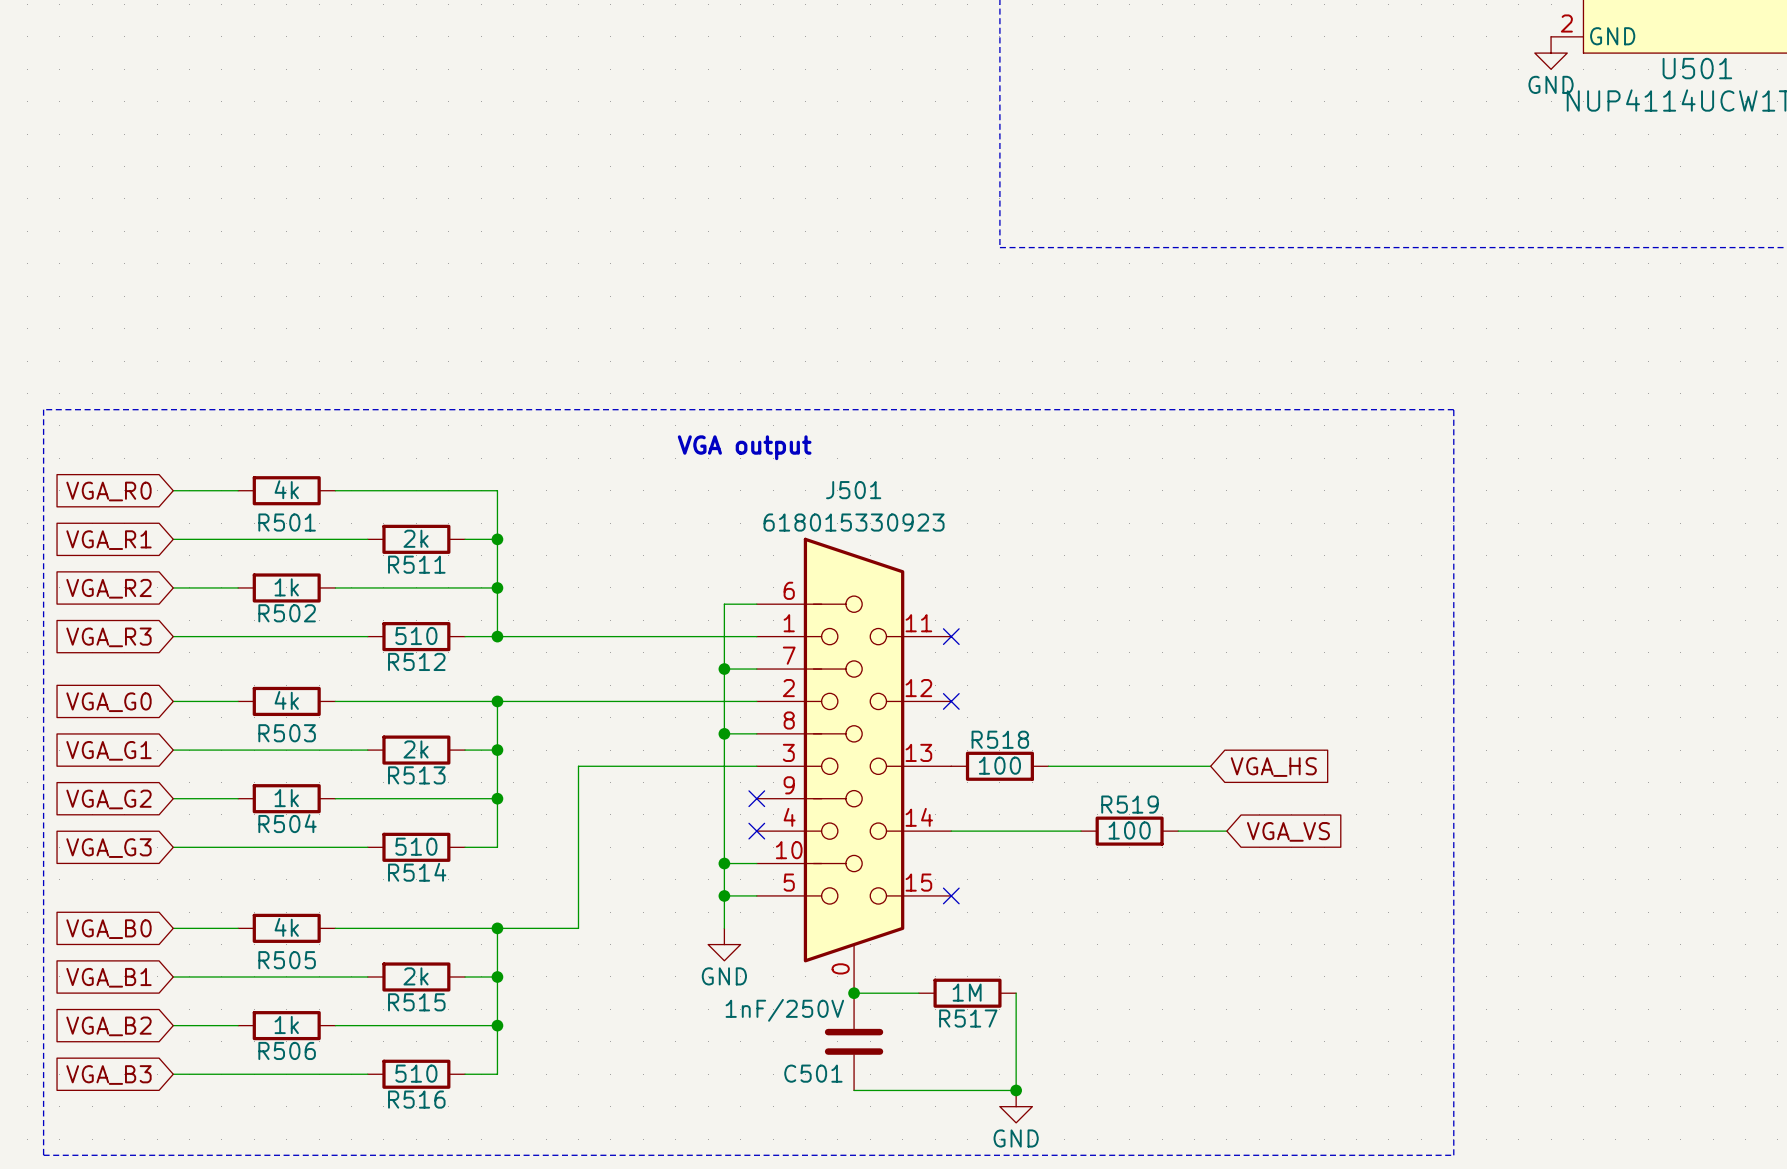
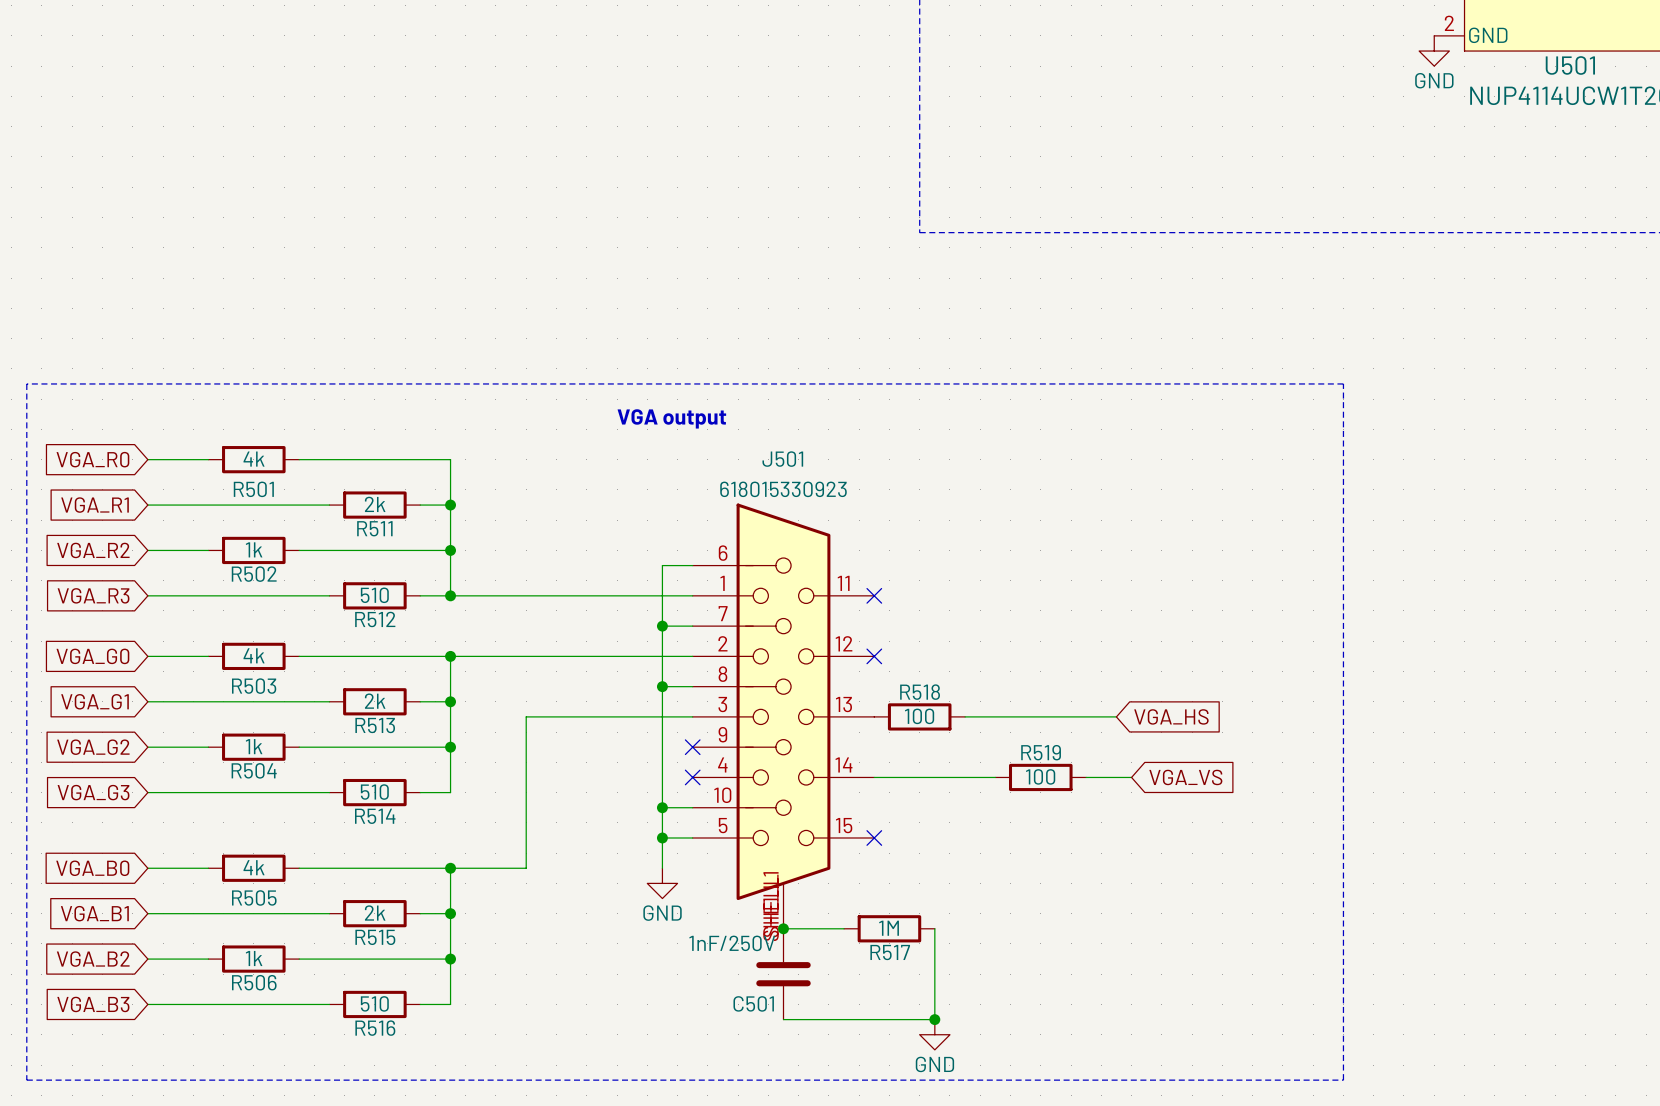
J501 symbol: [756, 537, 952, 994] -> [692, 503, 875, 929]

